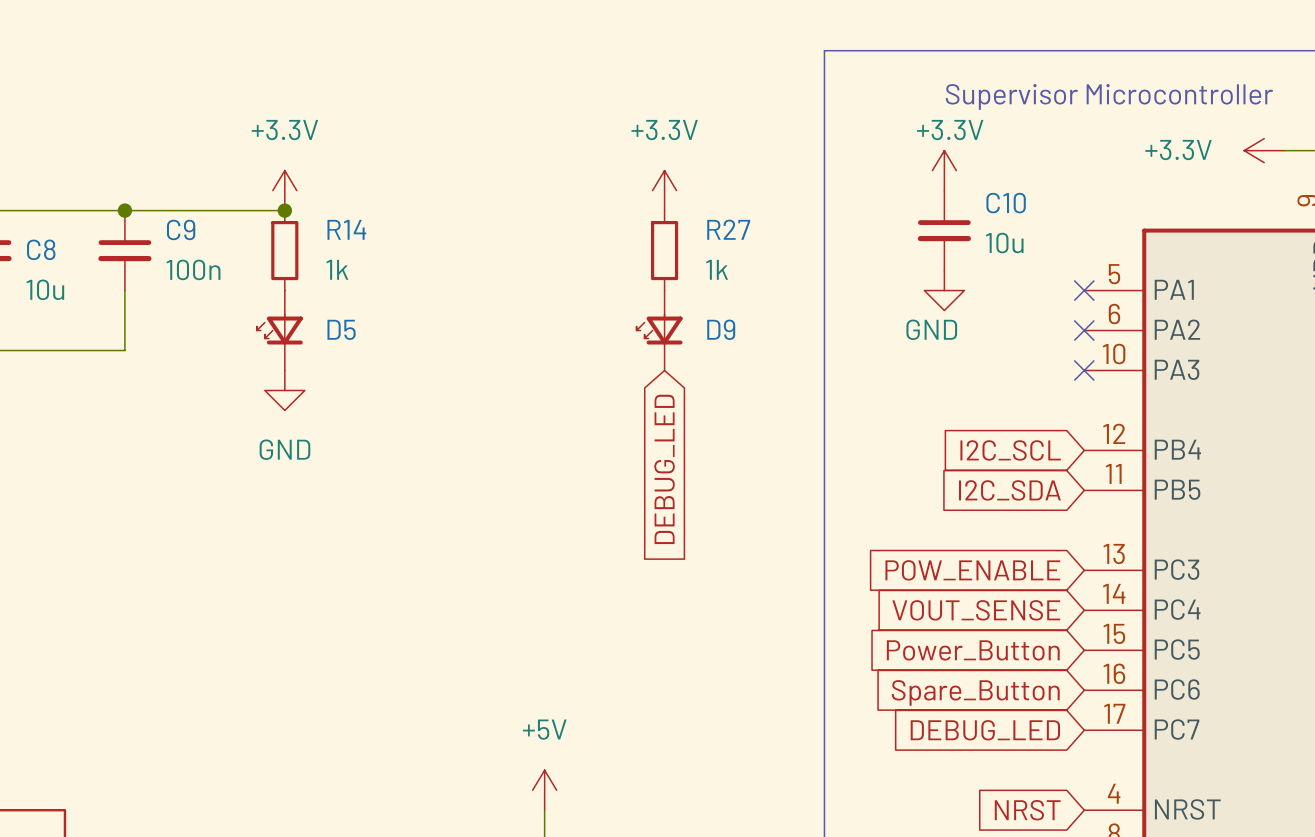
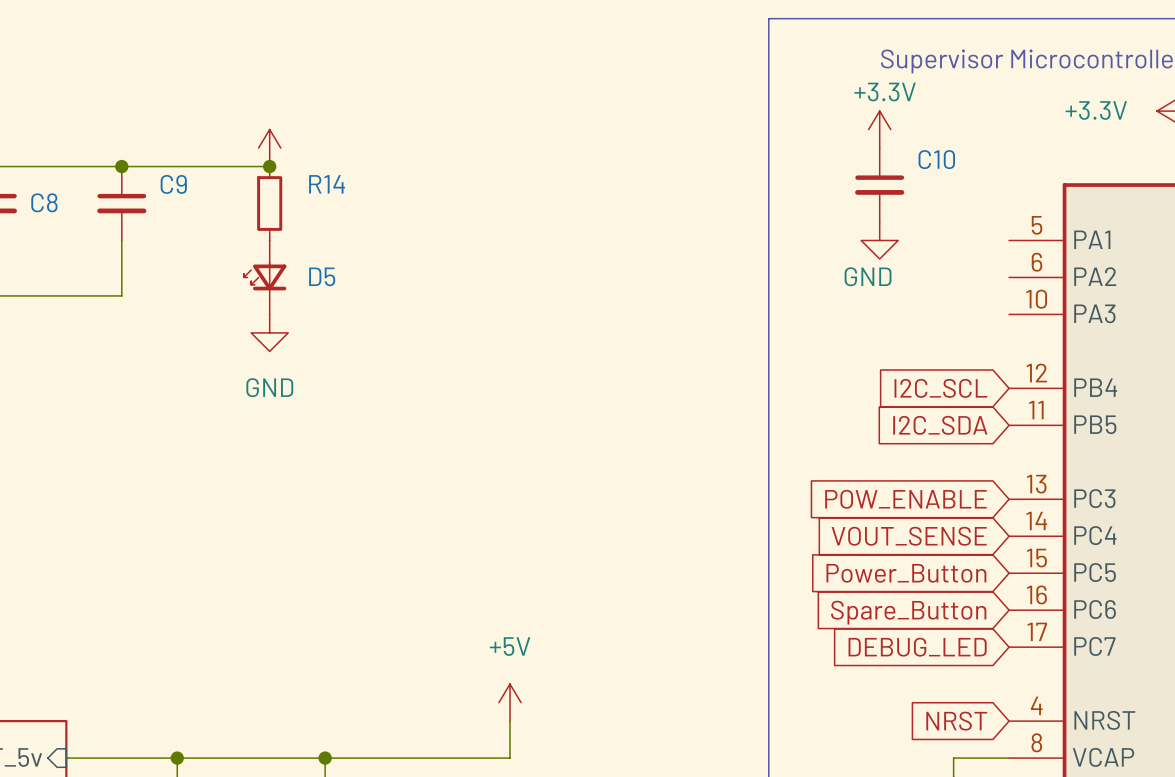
power symbol text: +3.3V (284, 130) -> none
power symbol: +3.3V (664, 190) -> none
C10 value: 10u (1004, 243) -> none
R27: 1k (664, 250) -> none
C9 value: 100n (193, 269) -> none
R14 value: 1k (337, 269) -> none
C8 value: 10u (45, 289) -> none
no-connect mark: (1084, 290) -> none
D9: (659, 330) -> none
no-connect mark: (1084, 330) -> none
no-connect mark: (1084, 370) -> none
global label: DEBUG_LED (664, 469) -> none

